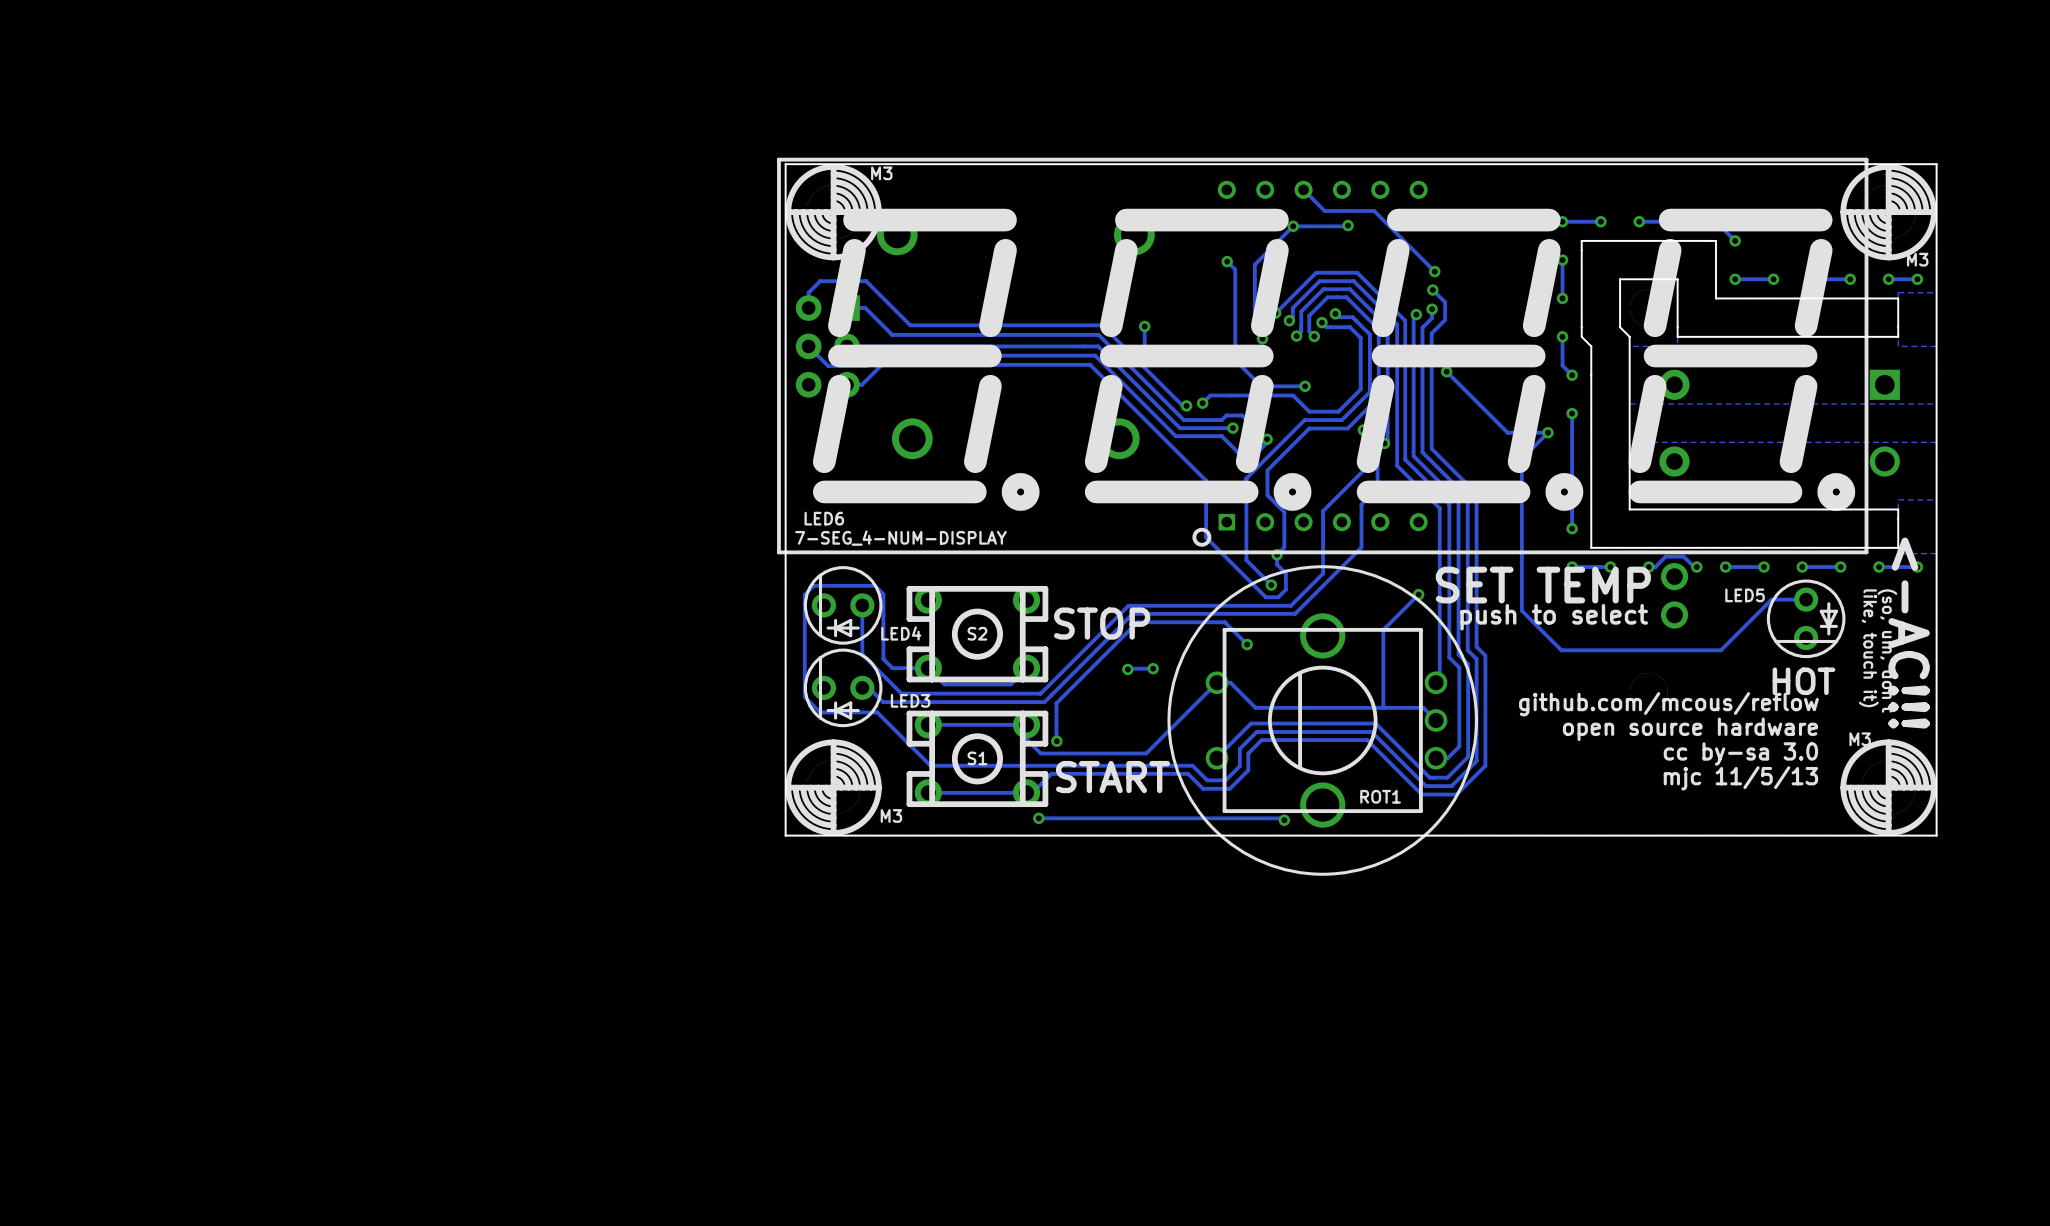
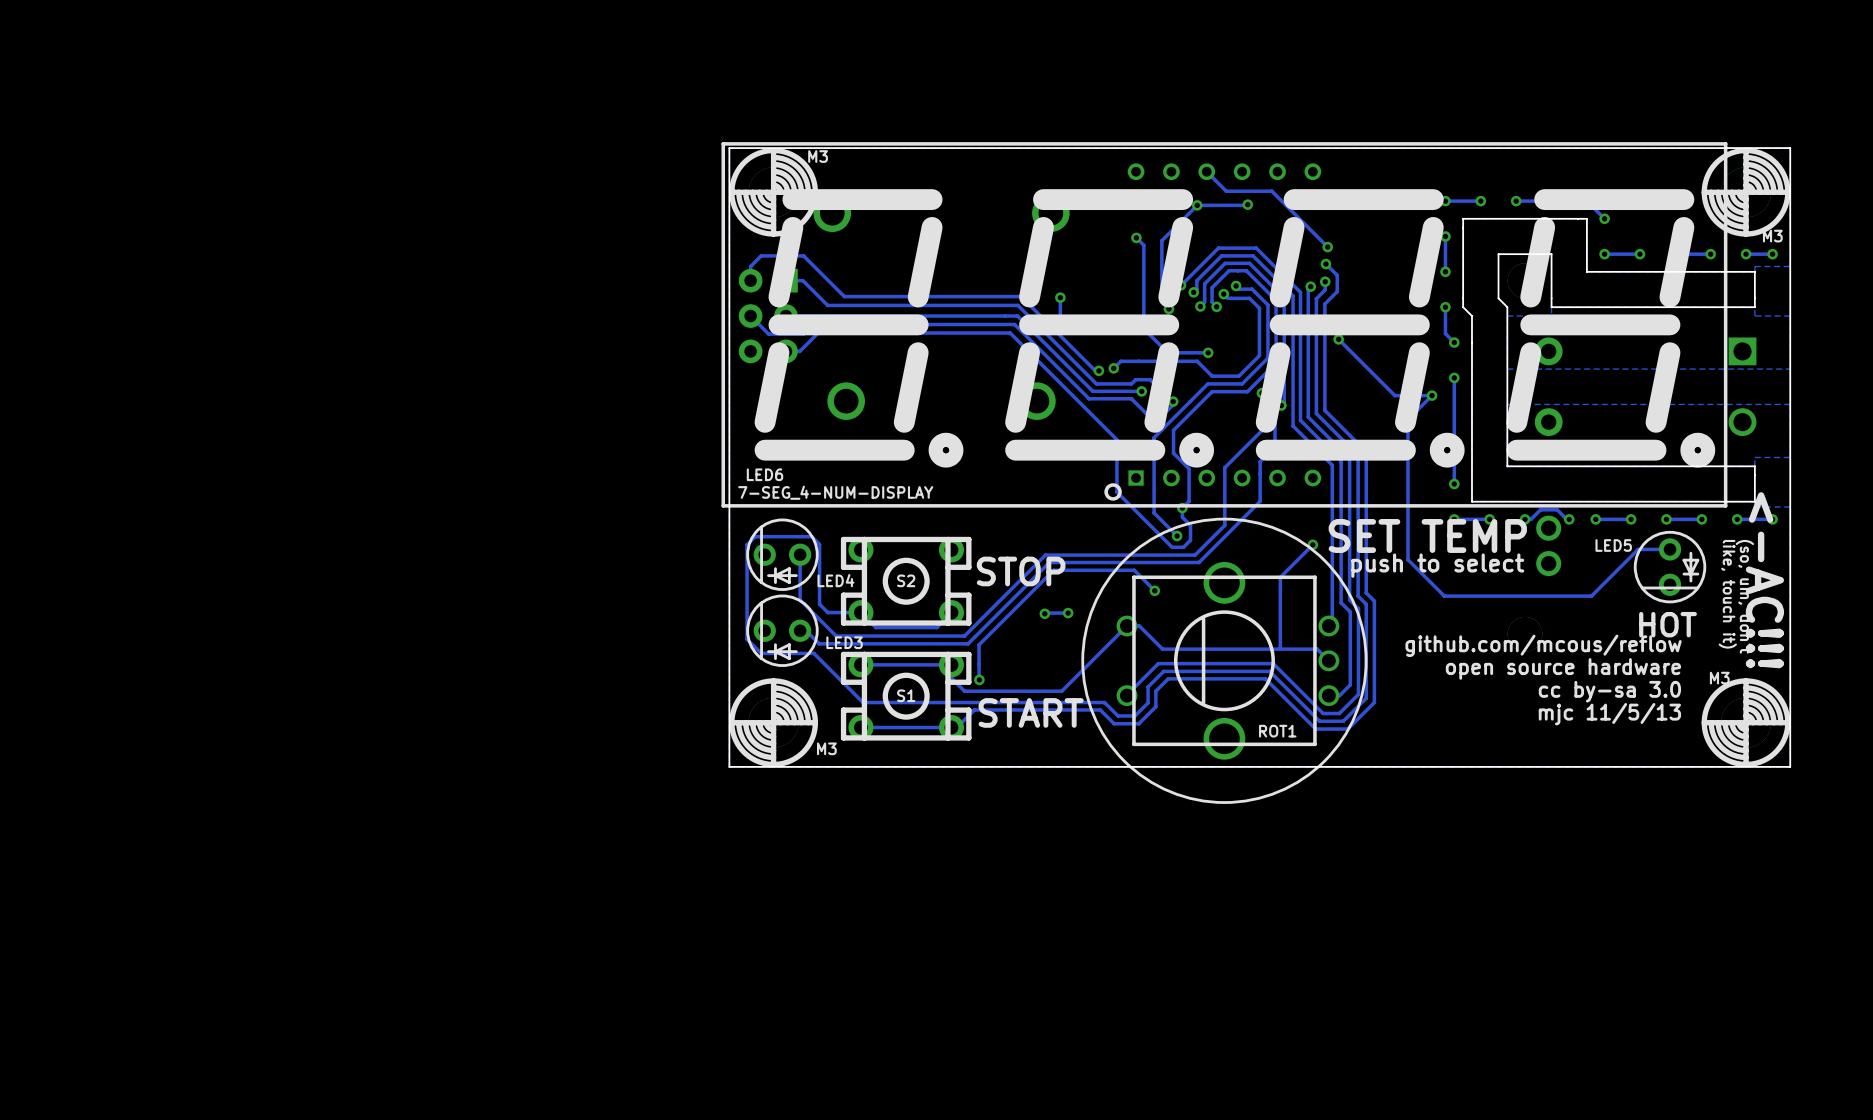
track: (1038, 818) (1282, 818) (1284, 820) -> none
via: (1038, 818) -> none
via: (1284, 820) -> none

